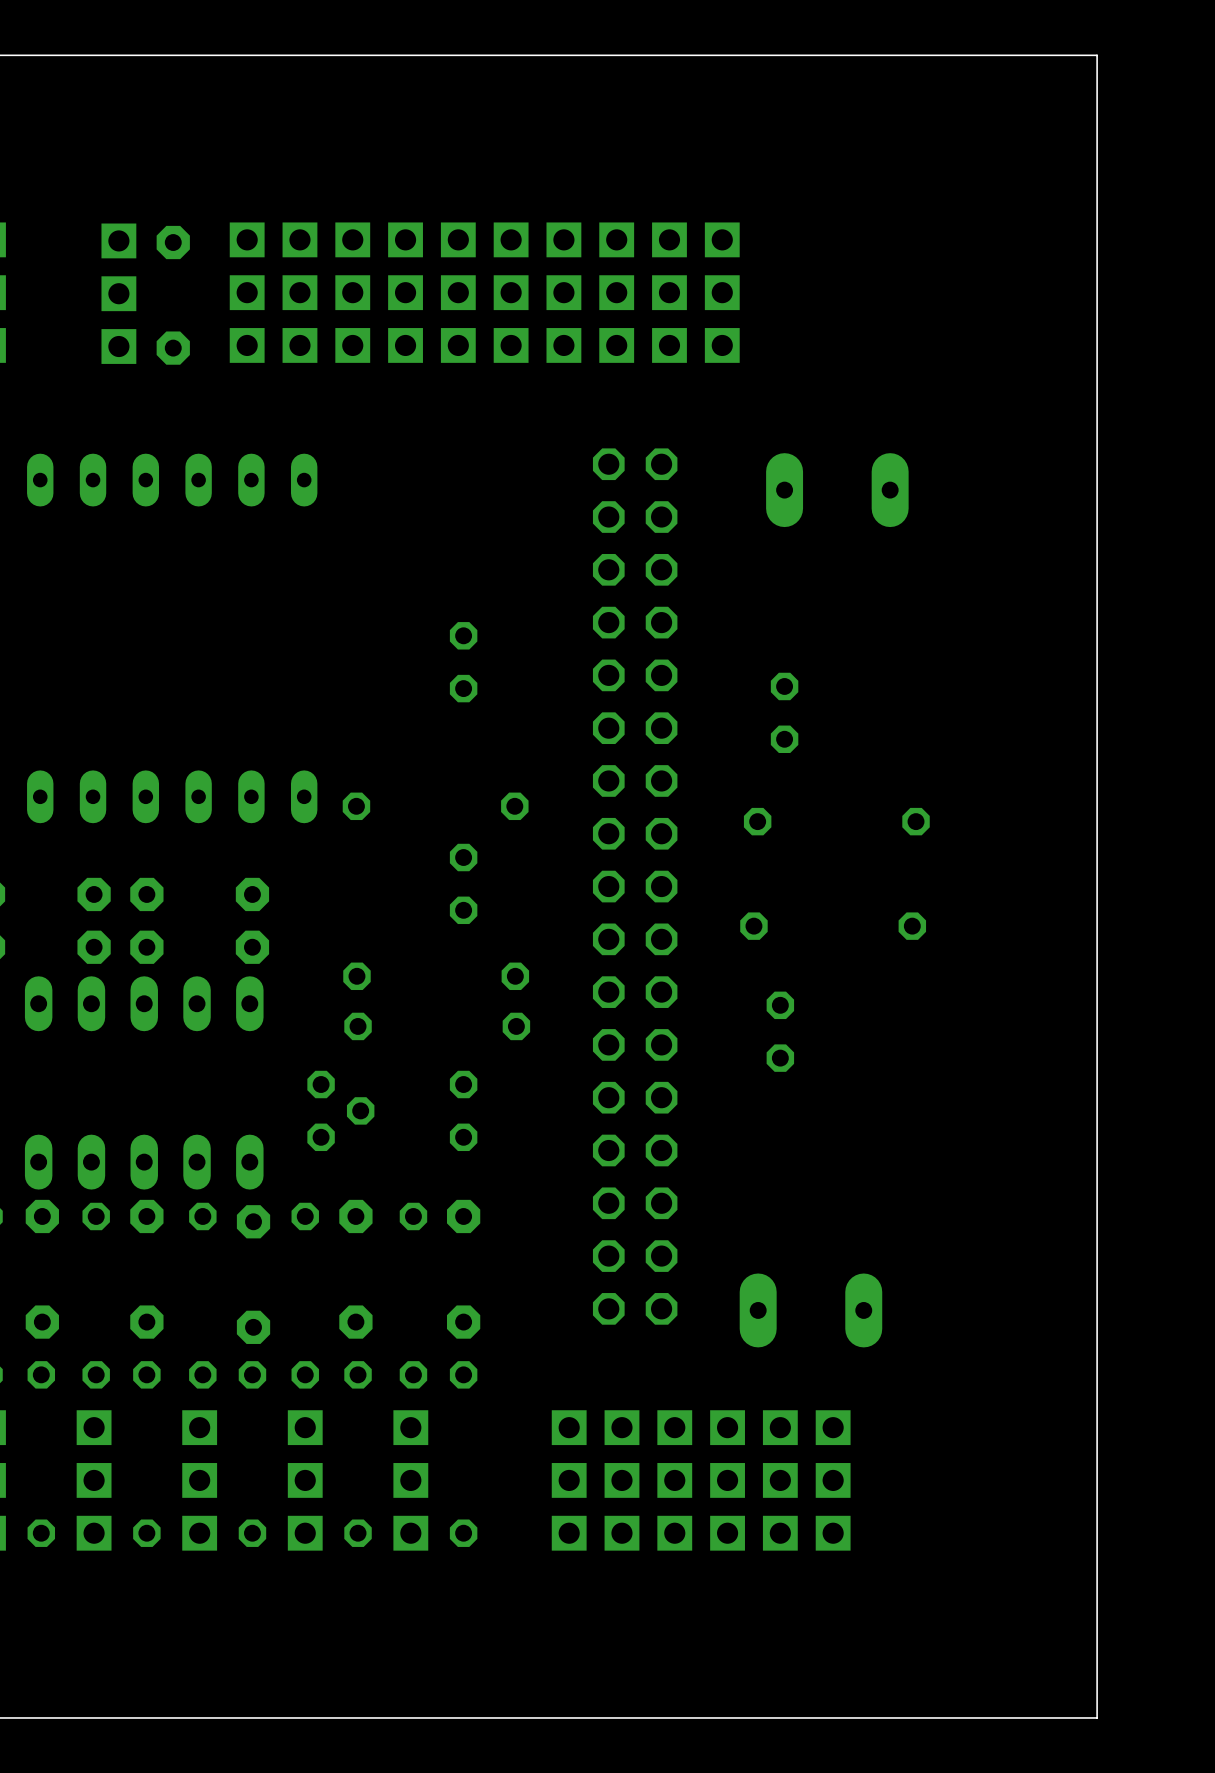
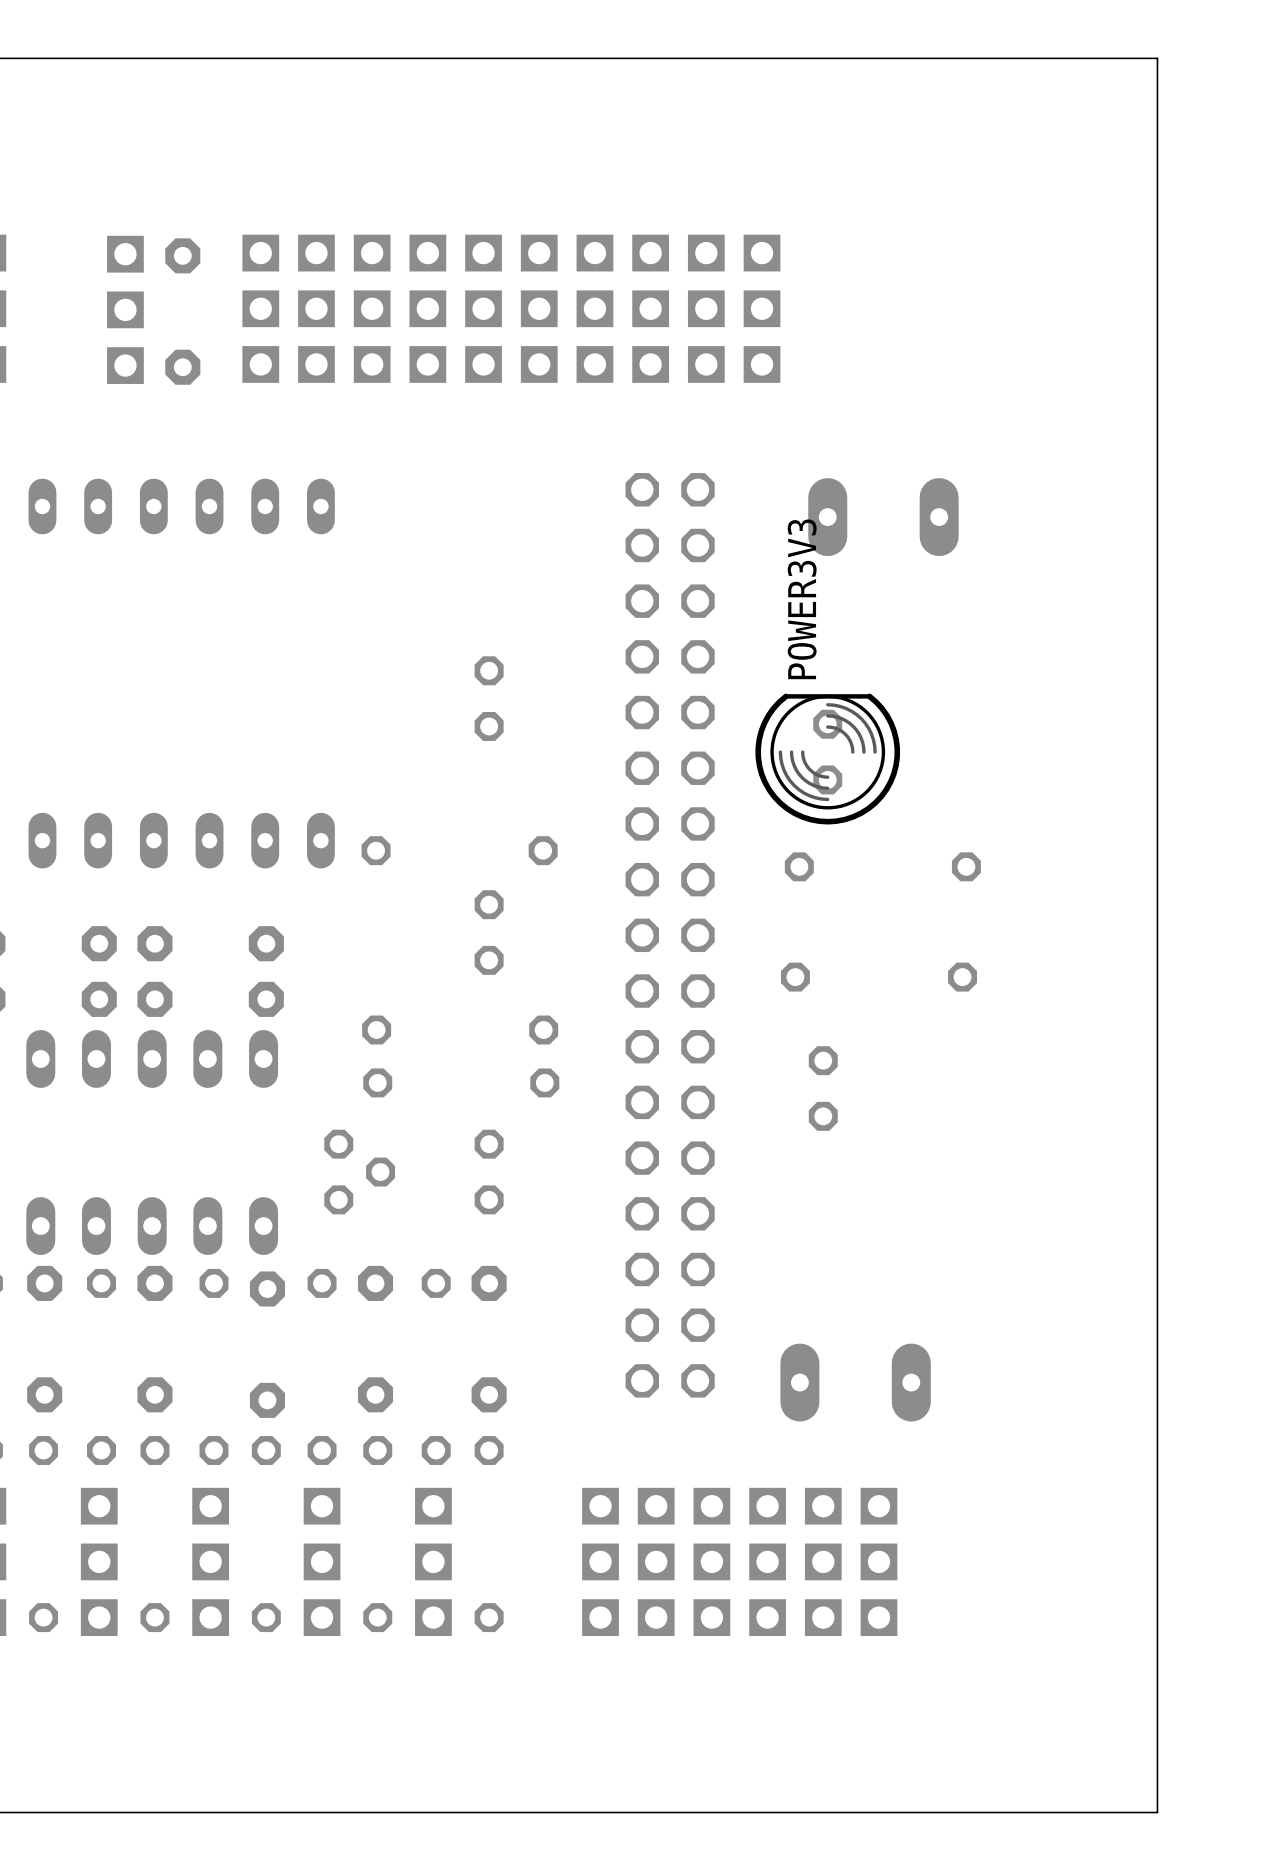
POWER3V3 side: top (784, 712) -> bottom (827, 759)

